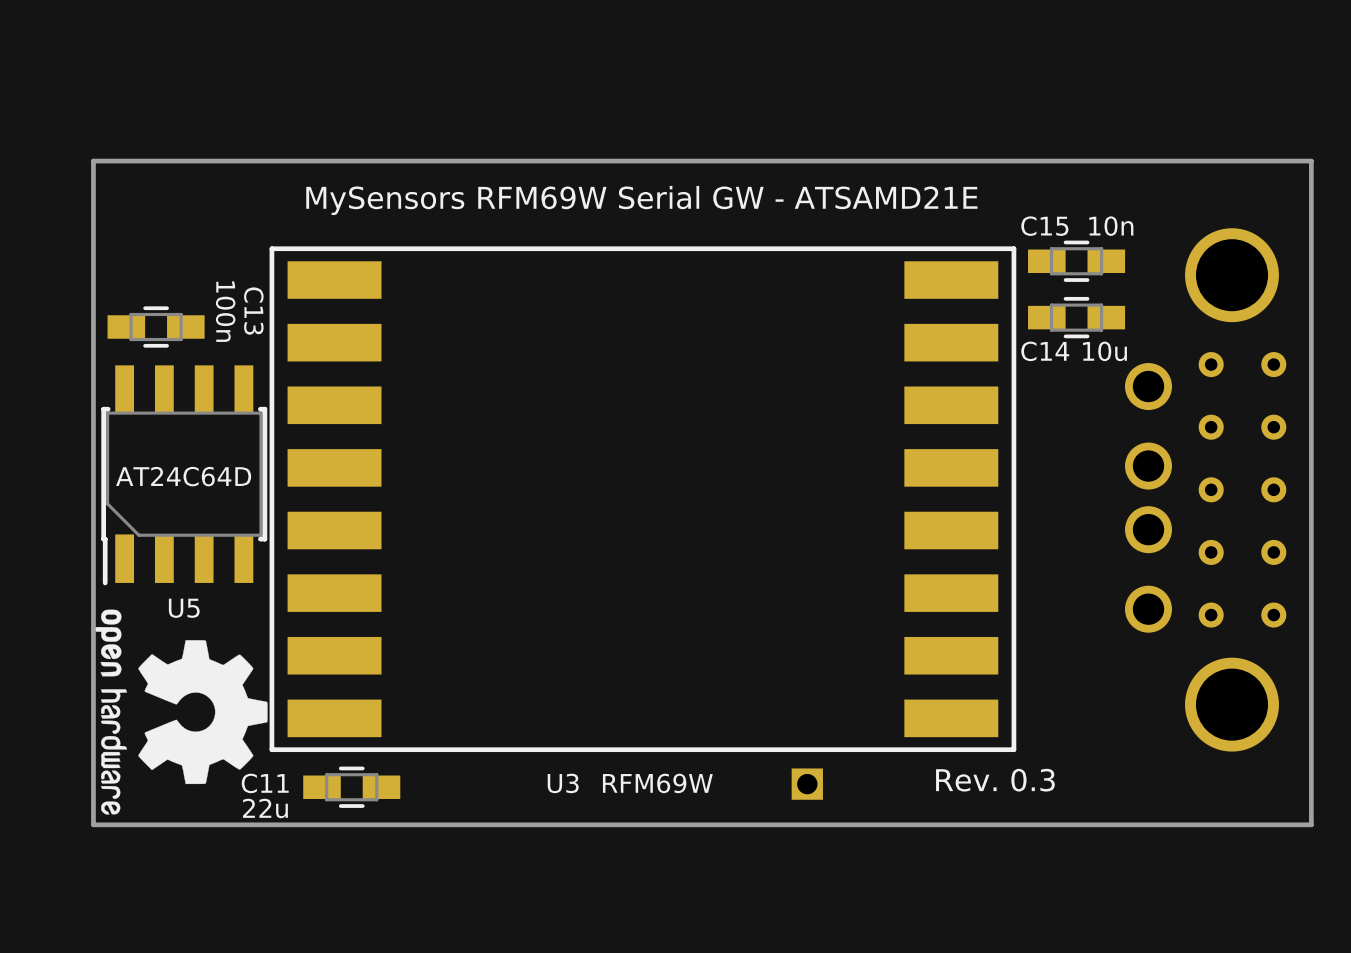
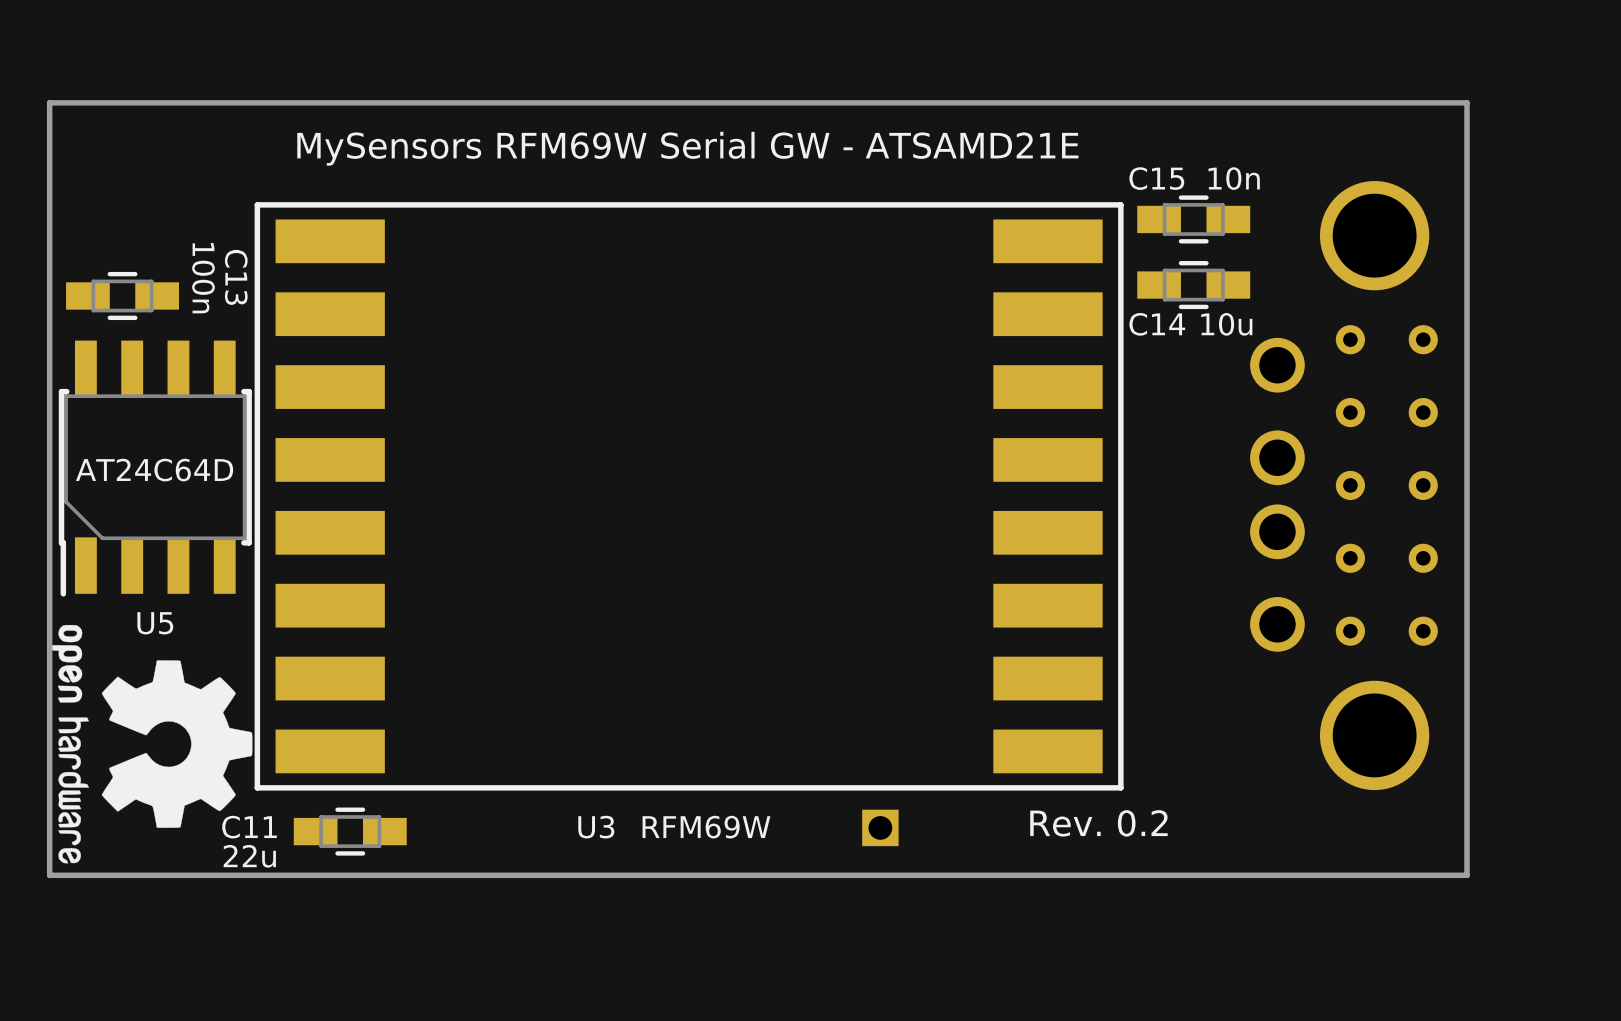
text: Rev. 0.3 (995, 780) -> Rev. 0.2 (1098, 823)

